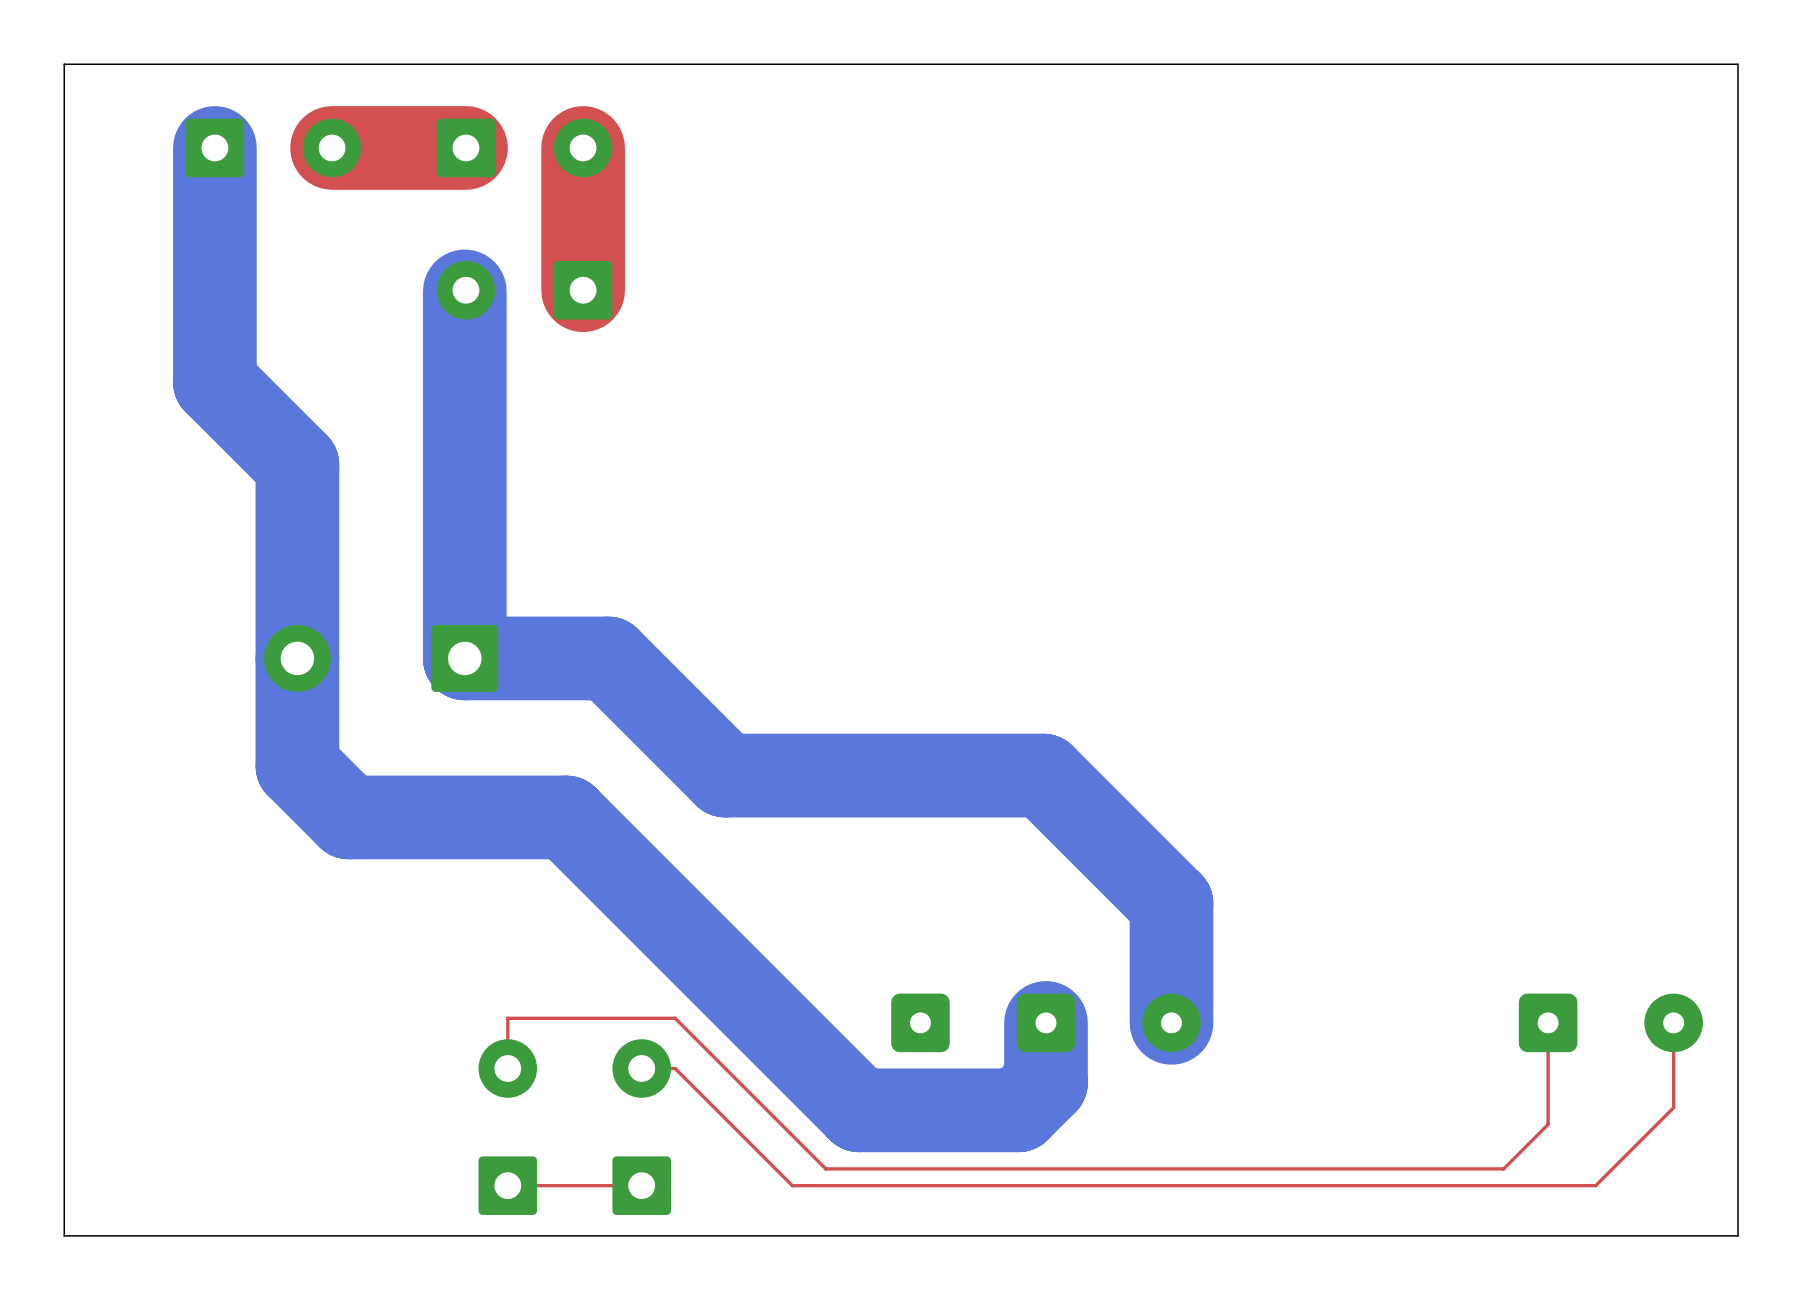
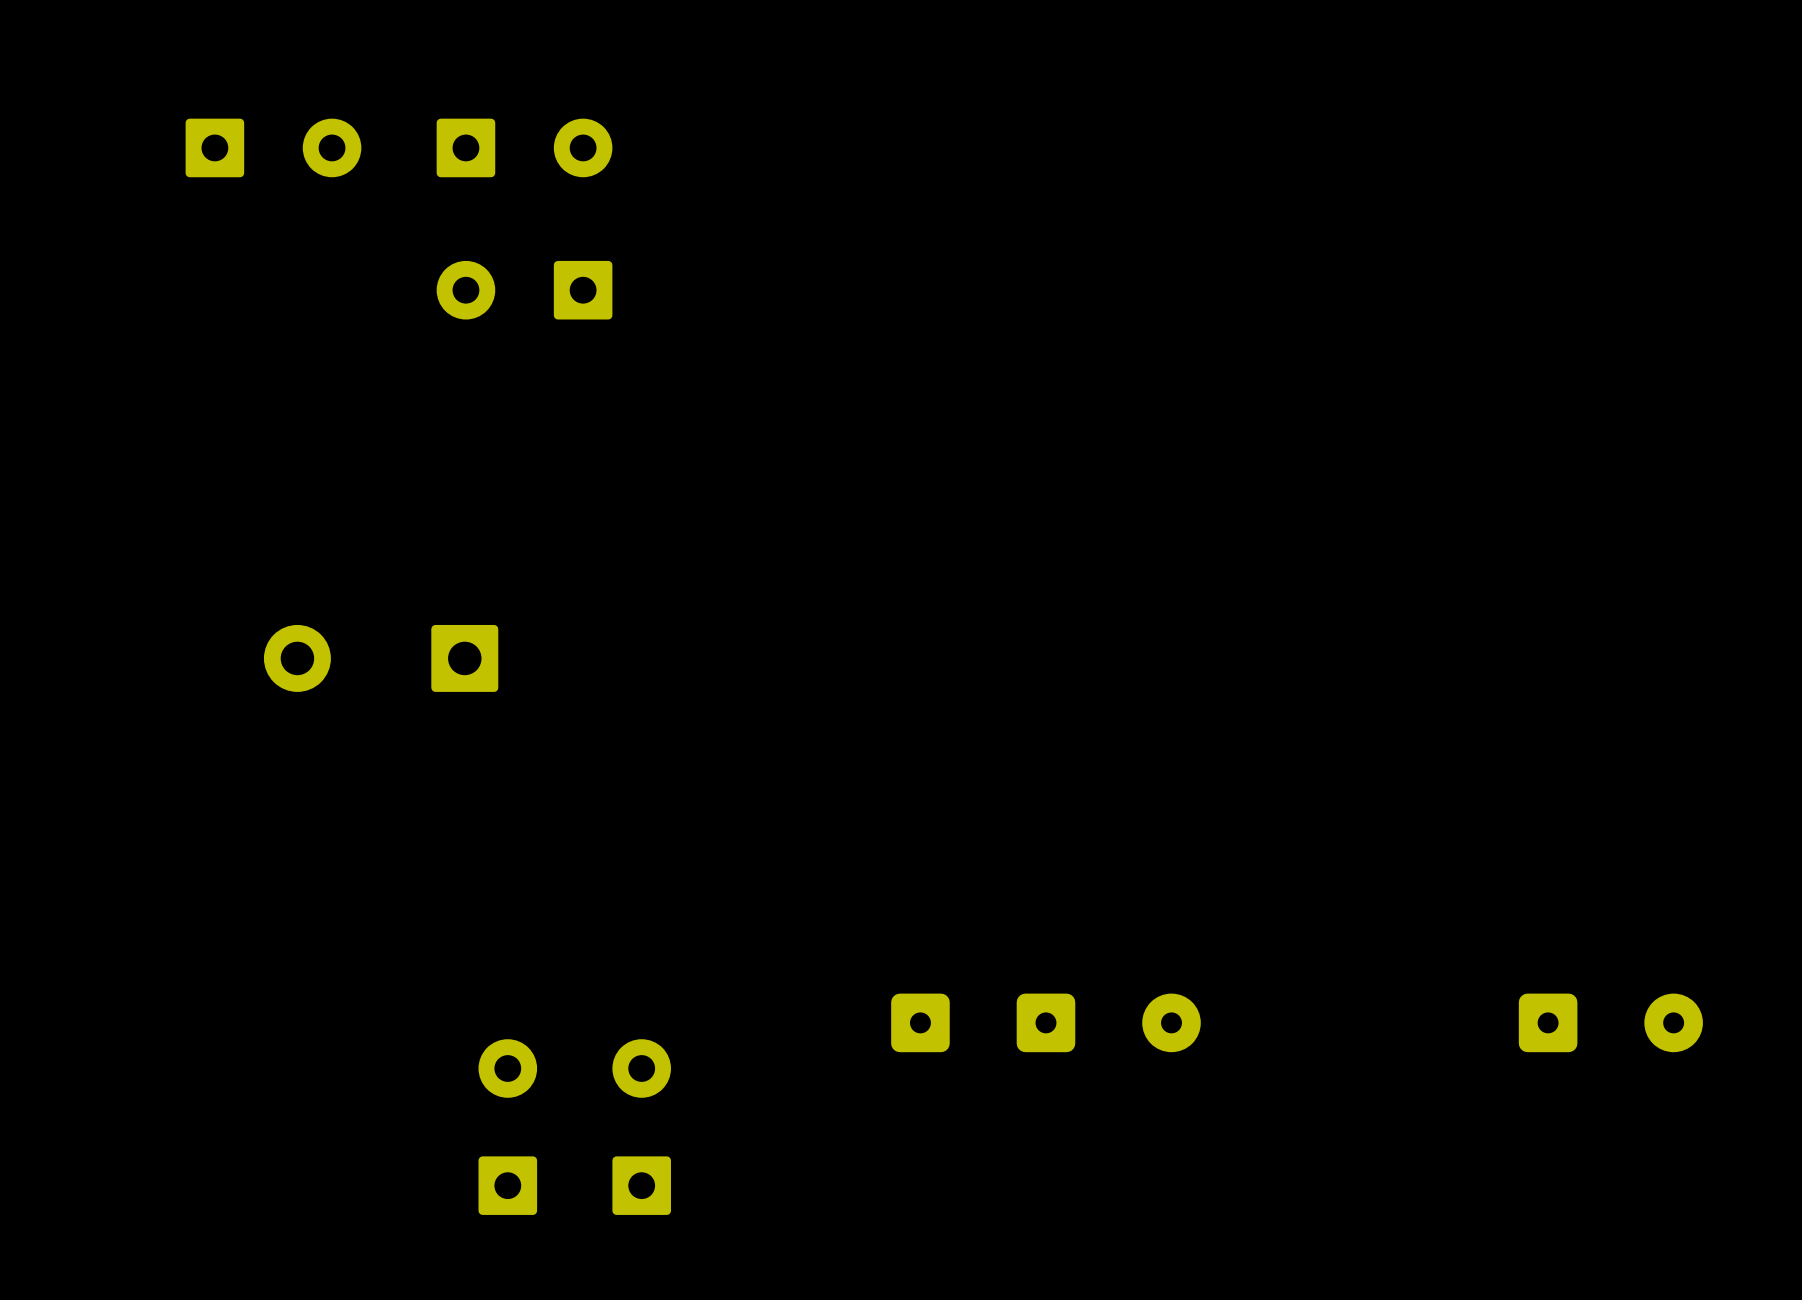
board edge: (1737, 64) (64, 64) (64, 1235) (1737, 1235) (1737, 64) -> none
bottom track: (214, 147) (214, 382) (297, 464) (297, 766) (348, 817) (566, 817) (859, 1110) (1018, 1110) (1045, 1082) (1045, 1022) -> none
top track: (465, 147) (332, 147) -> none
top track: (583, 147) (583, 290) -> none
bottom track: (465, 290) (464, 658) (608, 658) (725, 775) (1043, 775) (1171, 903) (1171, 1022) -> none
top track: (1673, 1022) (1673, 1107) (1595, 1185) (792, 1185) (675, 1068) (641, 1068) -> none
top track: (1553, 1028) (1548, 1022) (1548, 1124) (1503, 1168) (825, 1168) (675, 1018) (507, 1018) (507, 1068) -> none
top track: (641, 1185) (507, 1185) -> none

